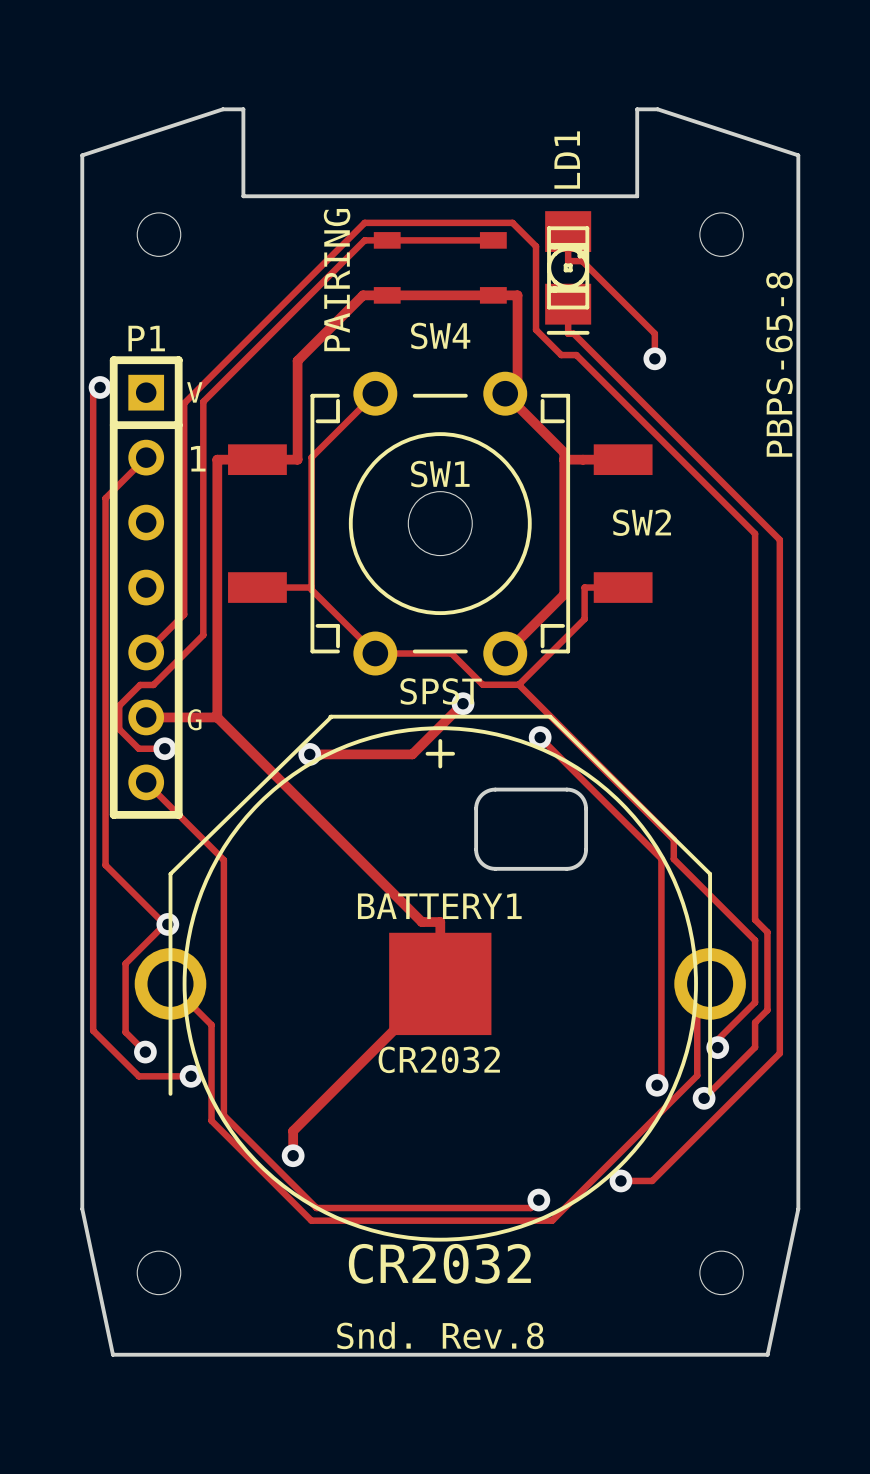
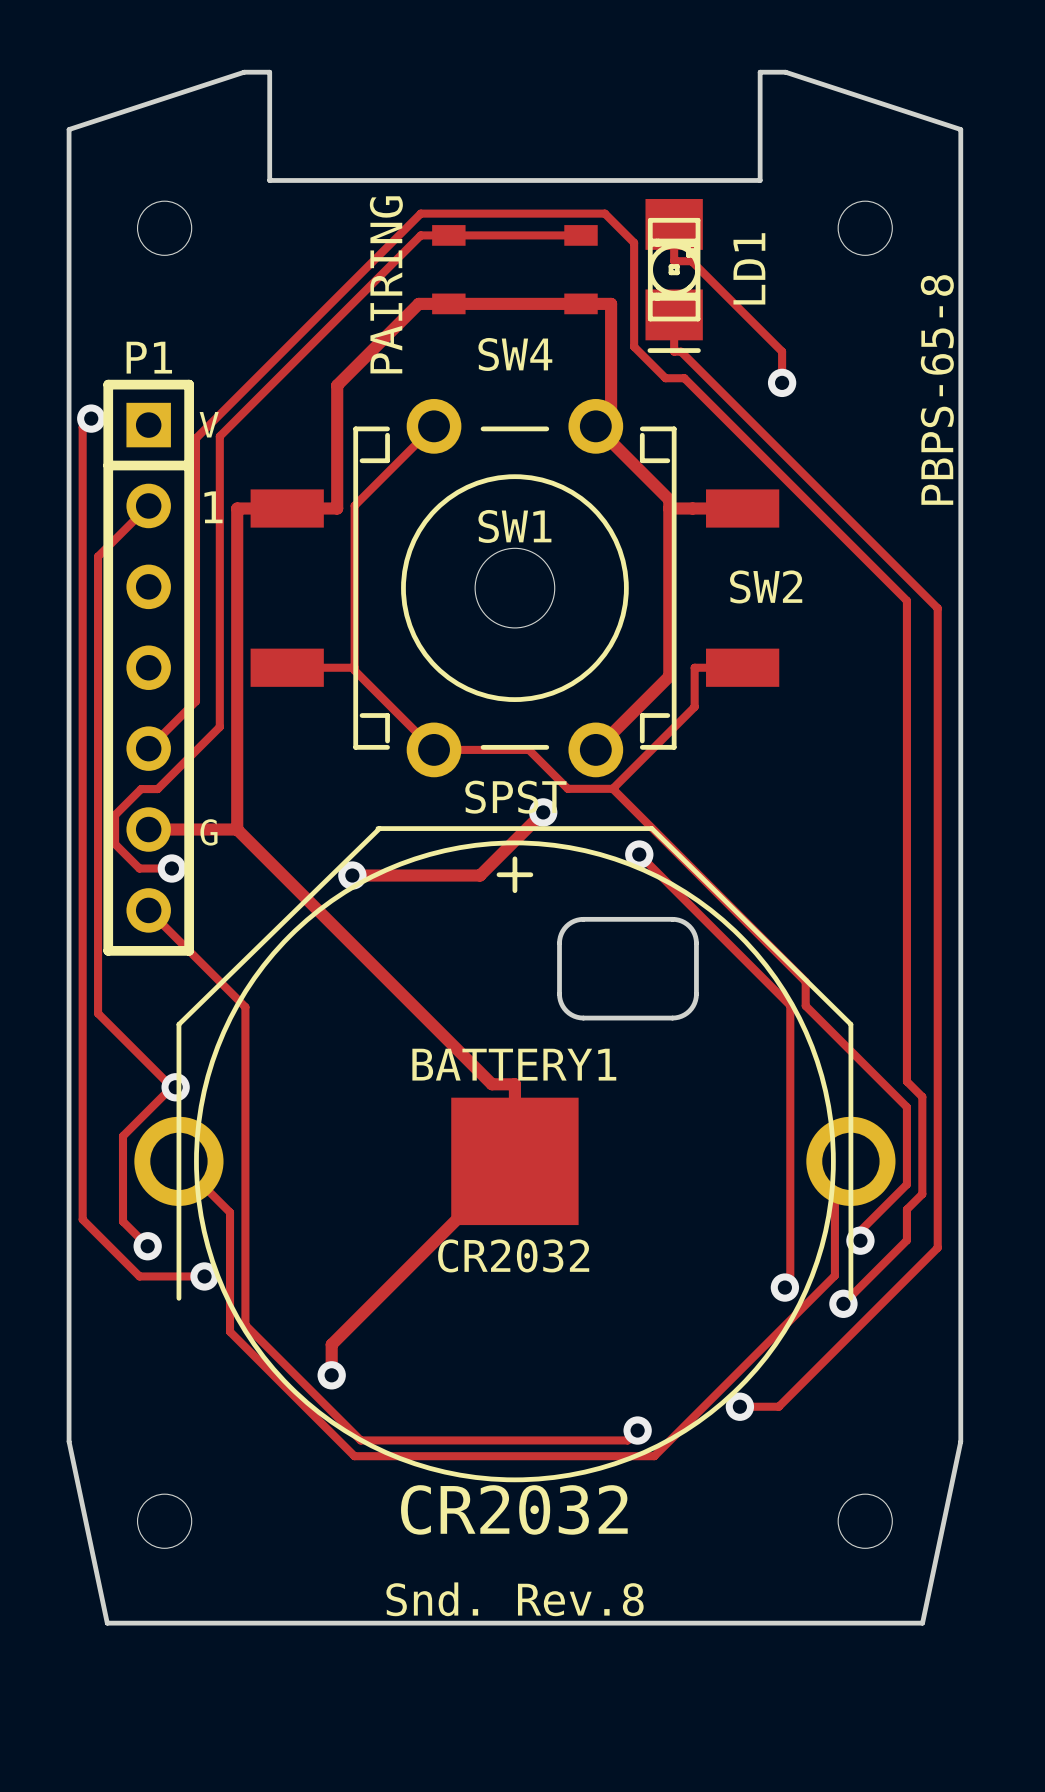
LD1 name position: LD1 (567, 160) -> LD1 (749, 268)

